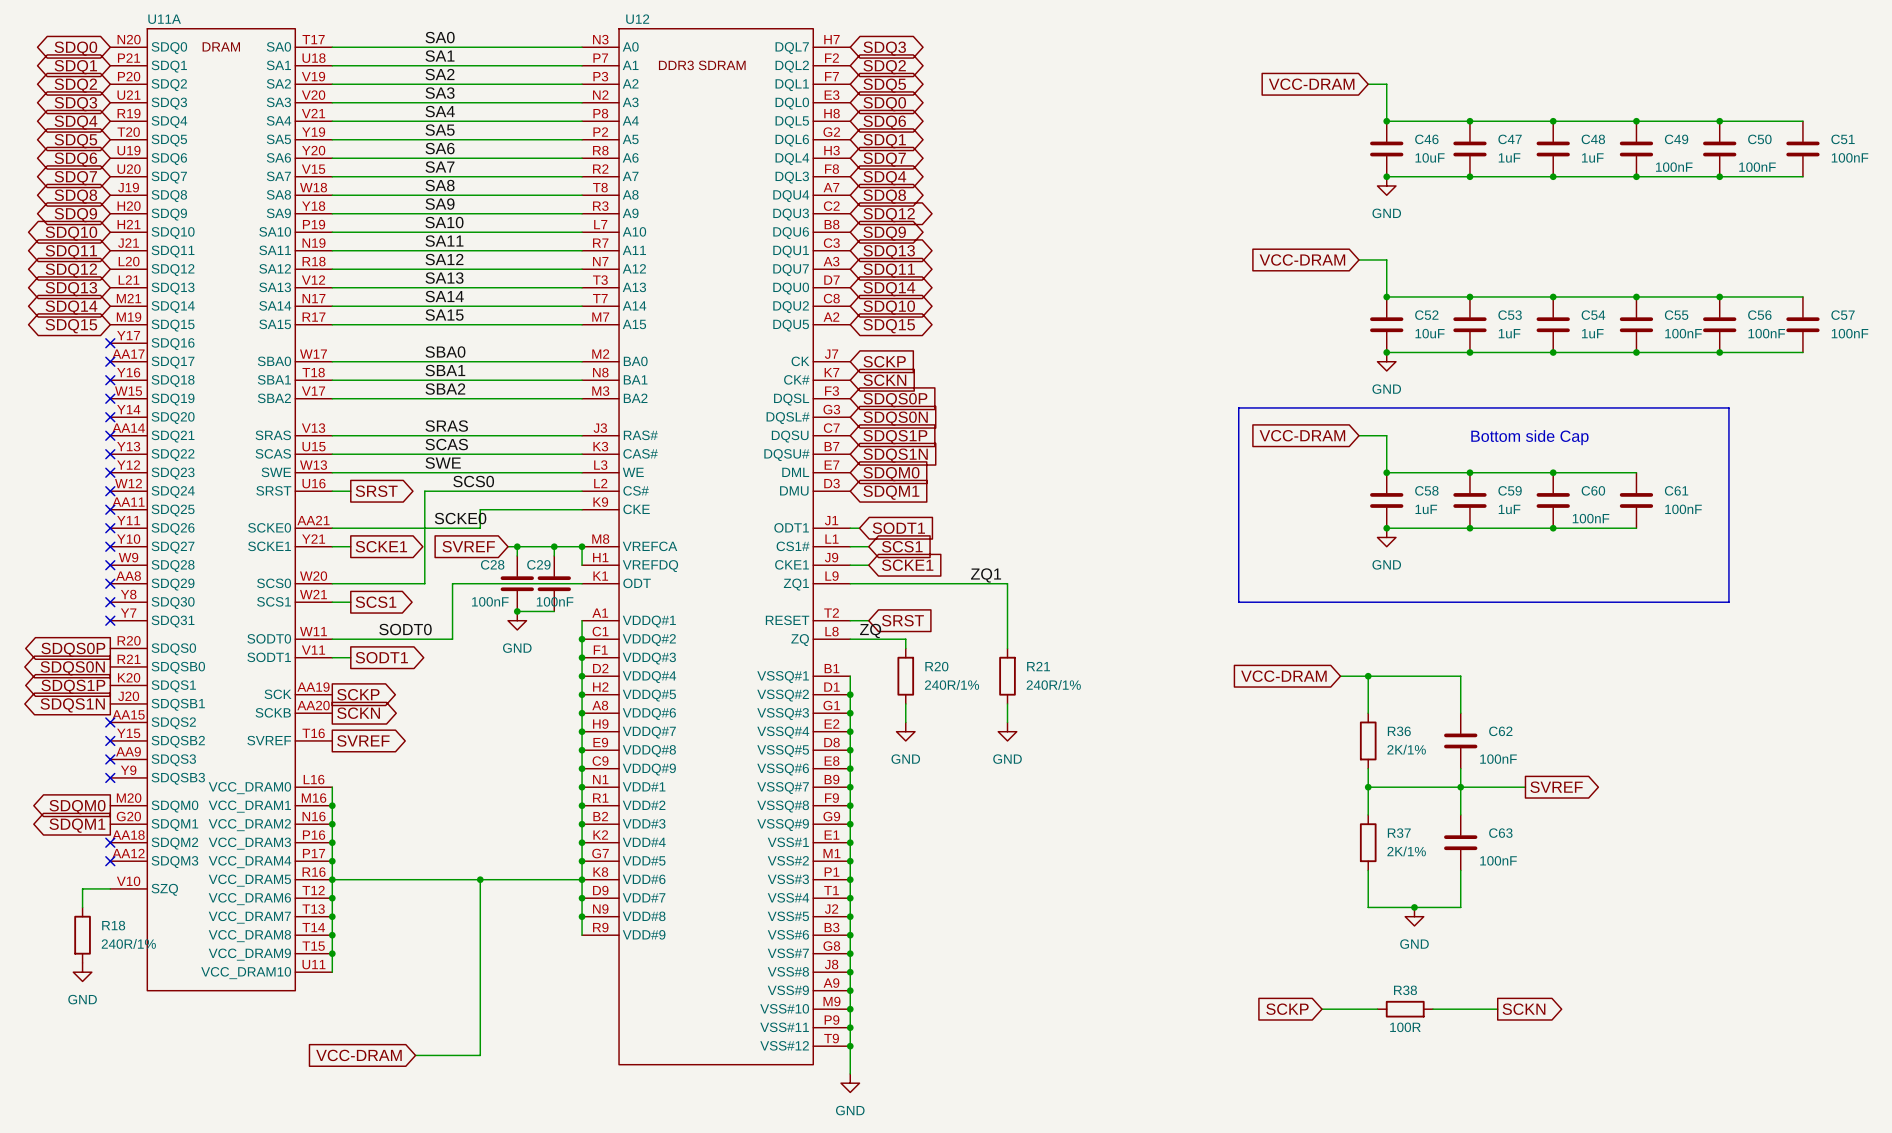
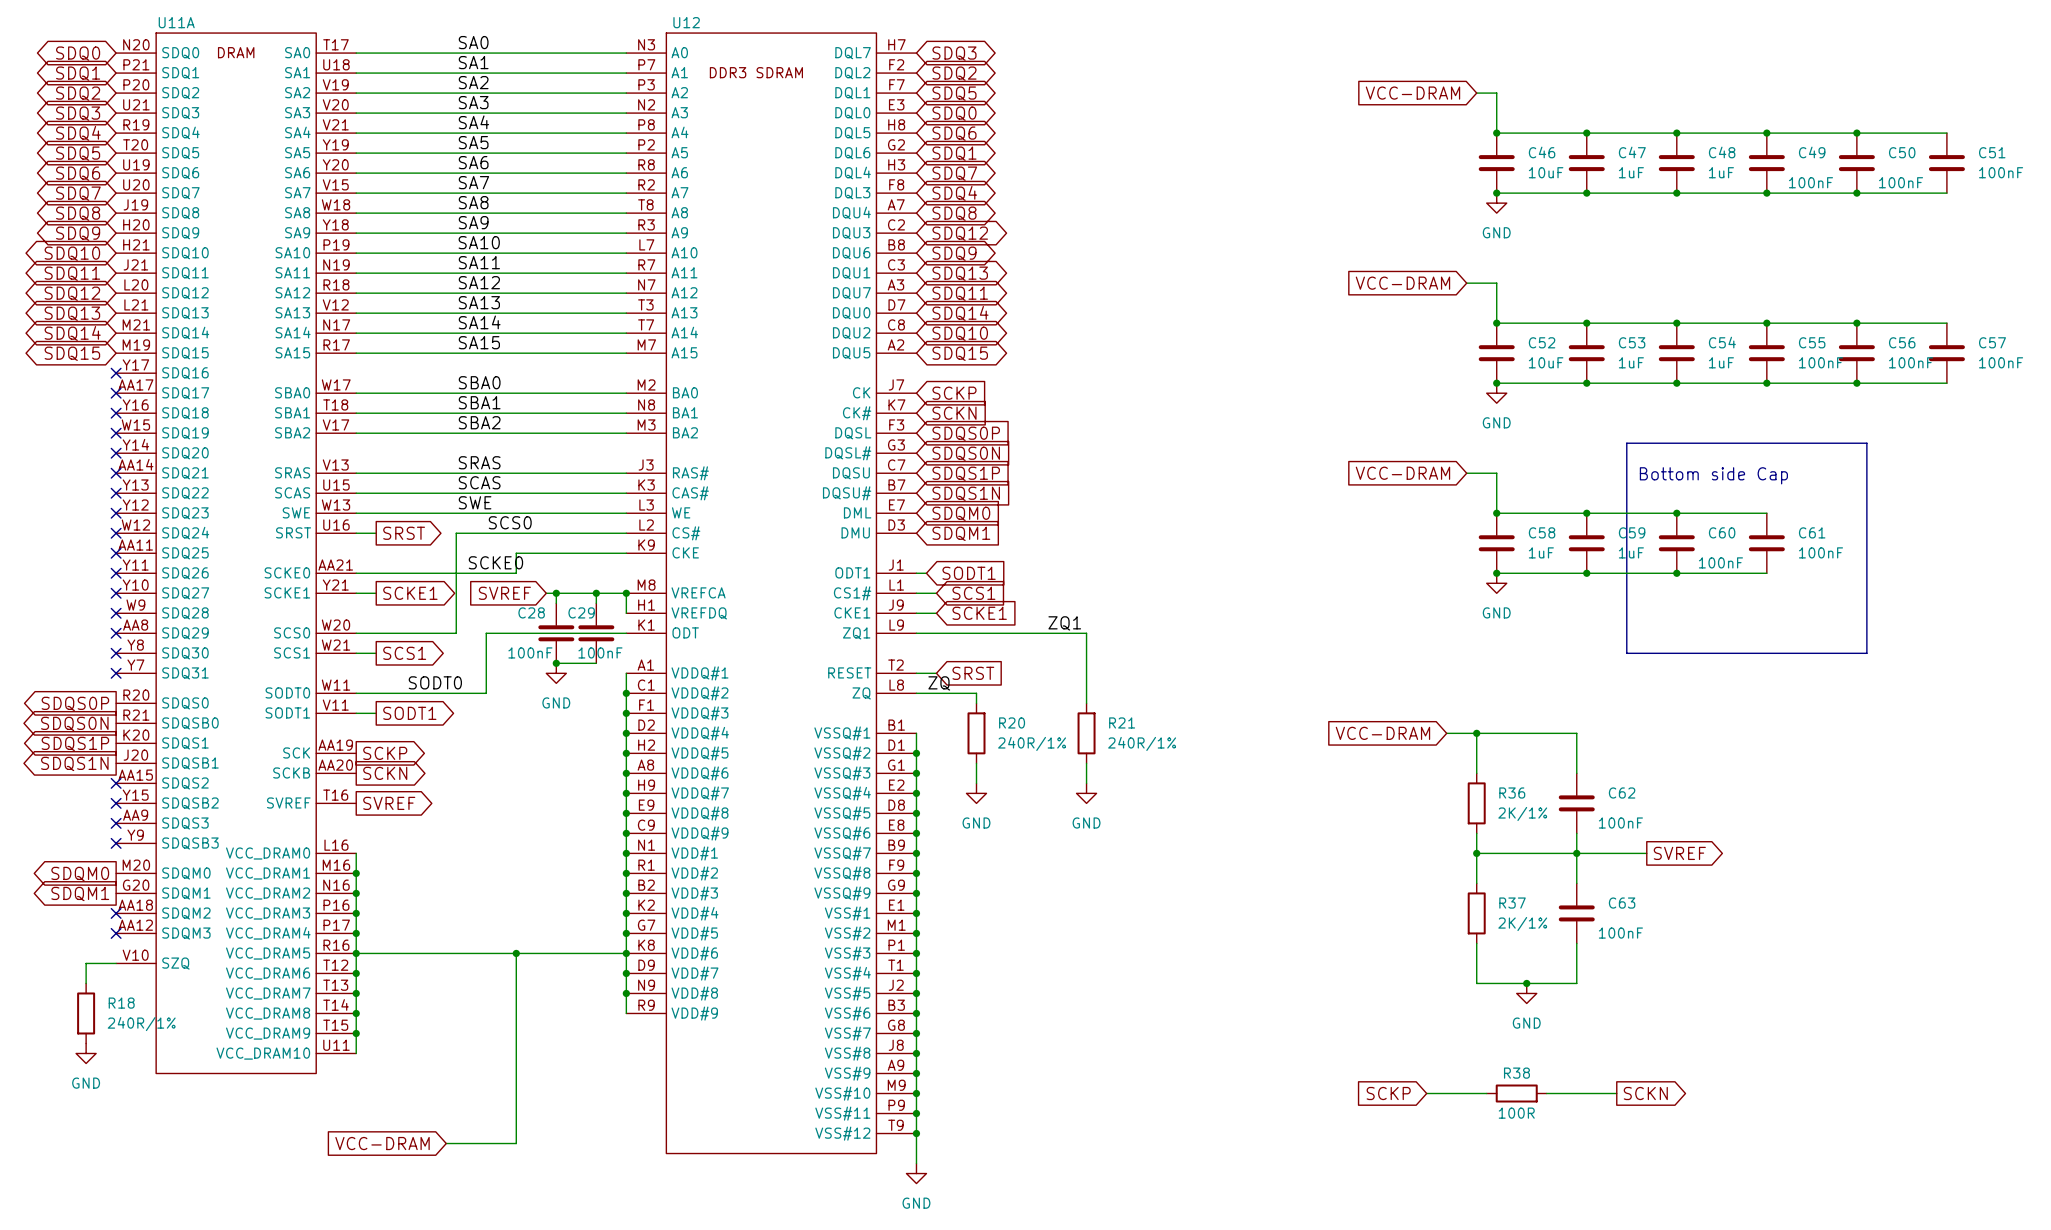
line: (1506, 407) (1238, 407) (1238, 602) (1506, 602) -> (1626, 443) (1626, 653)
text position: Bottom side Cap (1529, 437) -> Bottom side Cap (1713, 475)

